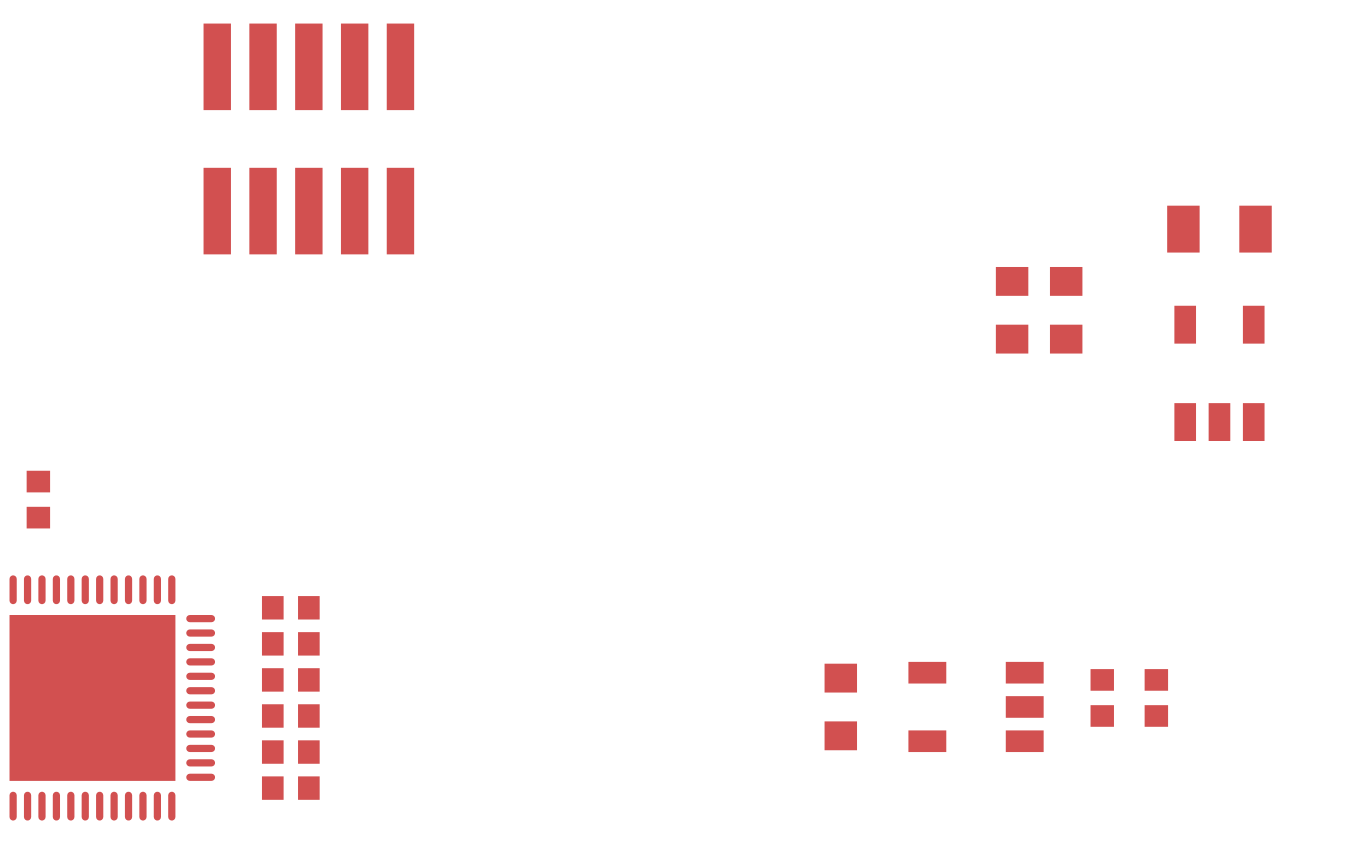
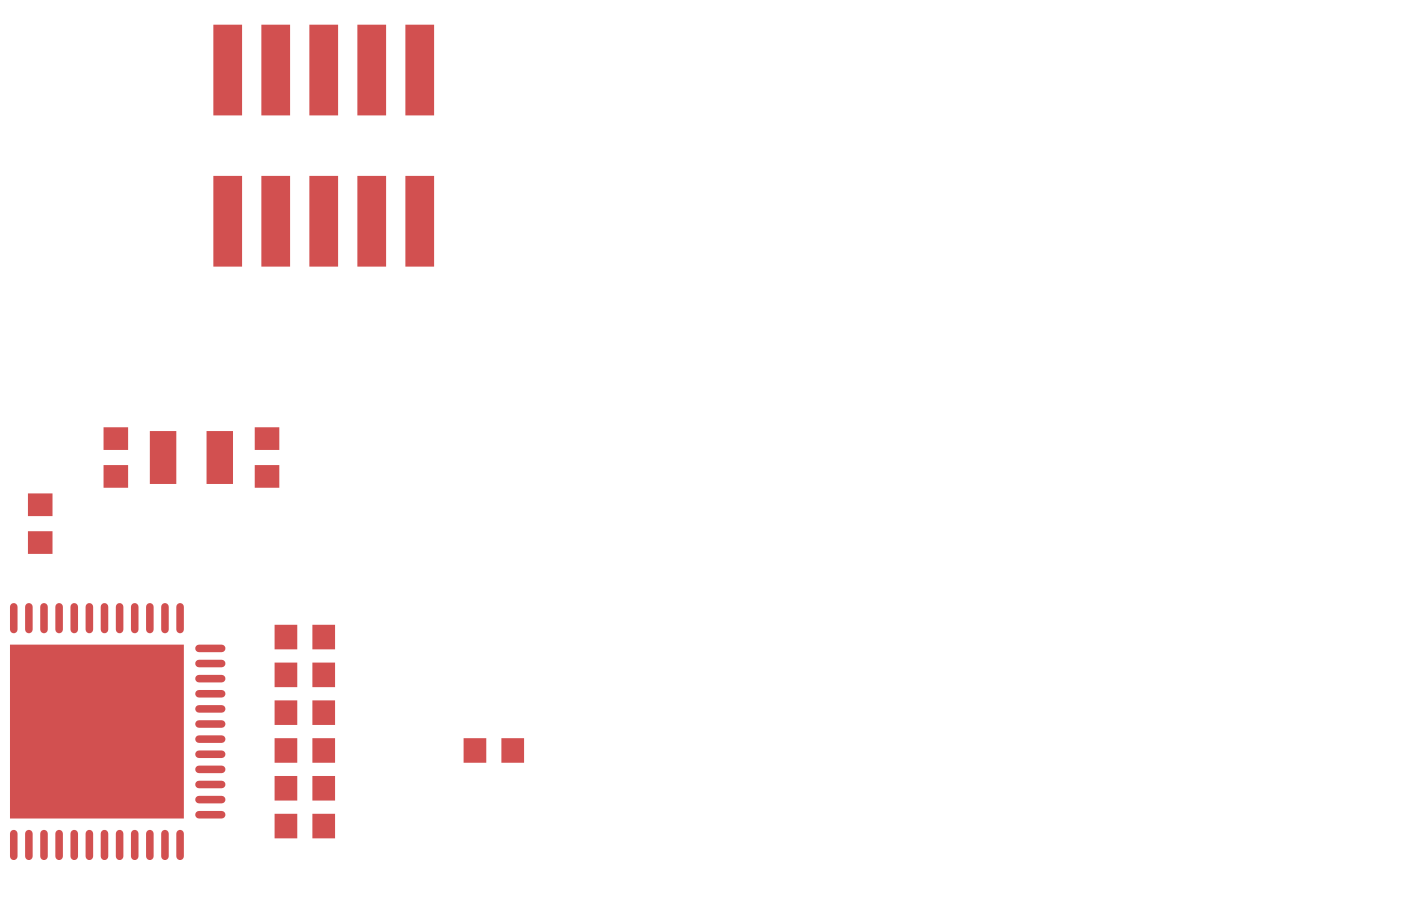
part: (1219, 229) -> none
part: (1012, 310) -> none
part: (1066, 310) -> none
part: (1219, 373) -> none
part: none -> (115, 457)
part: none -> (191, 457)
part: none -> (267, 457)
part: (1102, 697) -> none
part: (1156, 697) -> none
part: (840, 706) -> none
part: (976, 706) -> none
part: none -> (493, 750)

